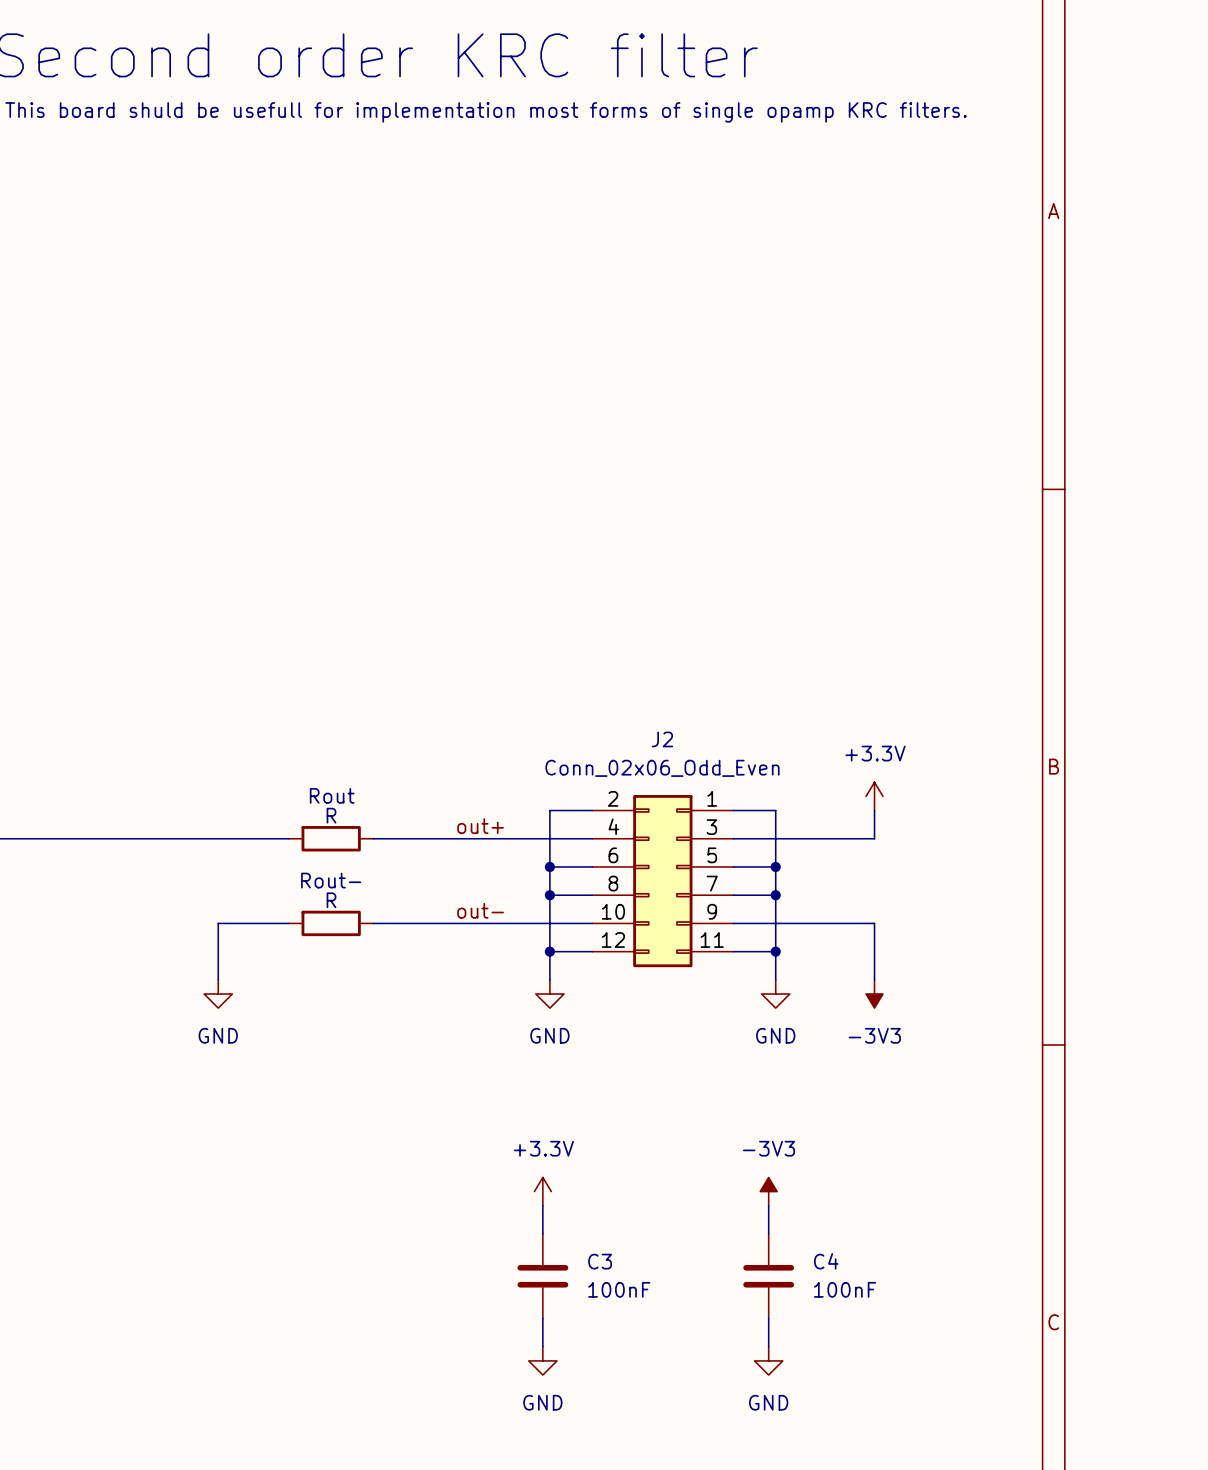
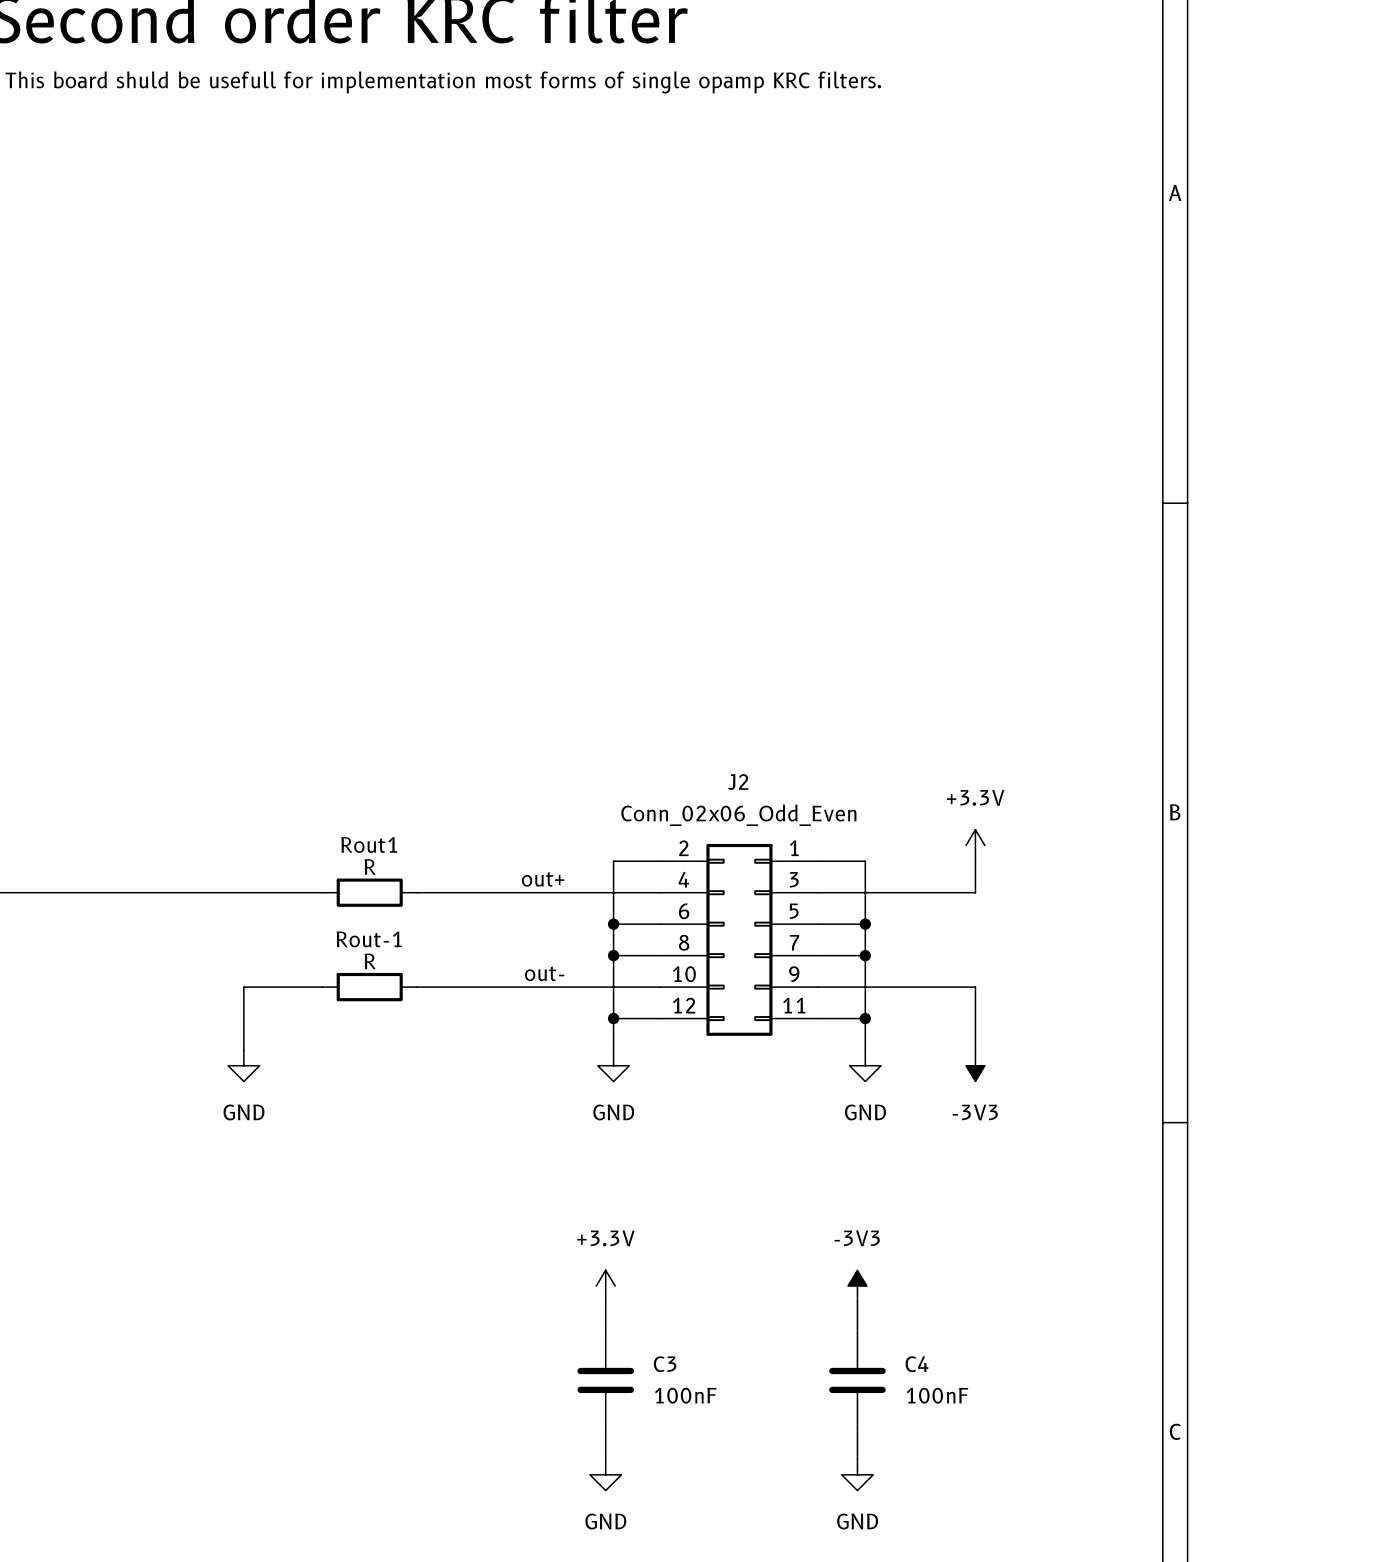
Rout name: Rout (332, 795) -> Rout1 (369, 845)
Rout- name: Rout- (331, 880) -> Rout-1 (369, 939)

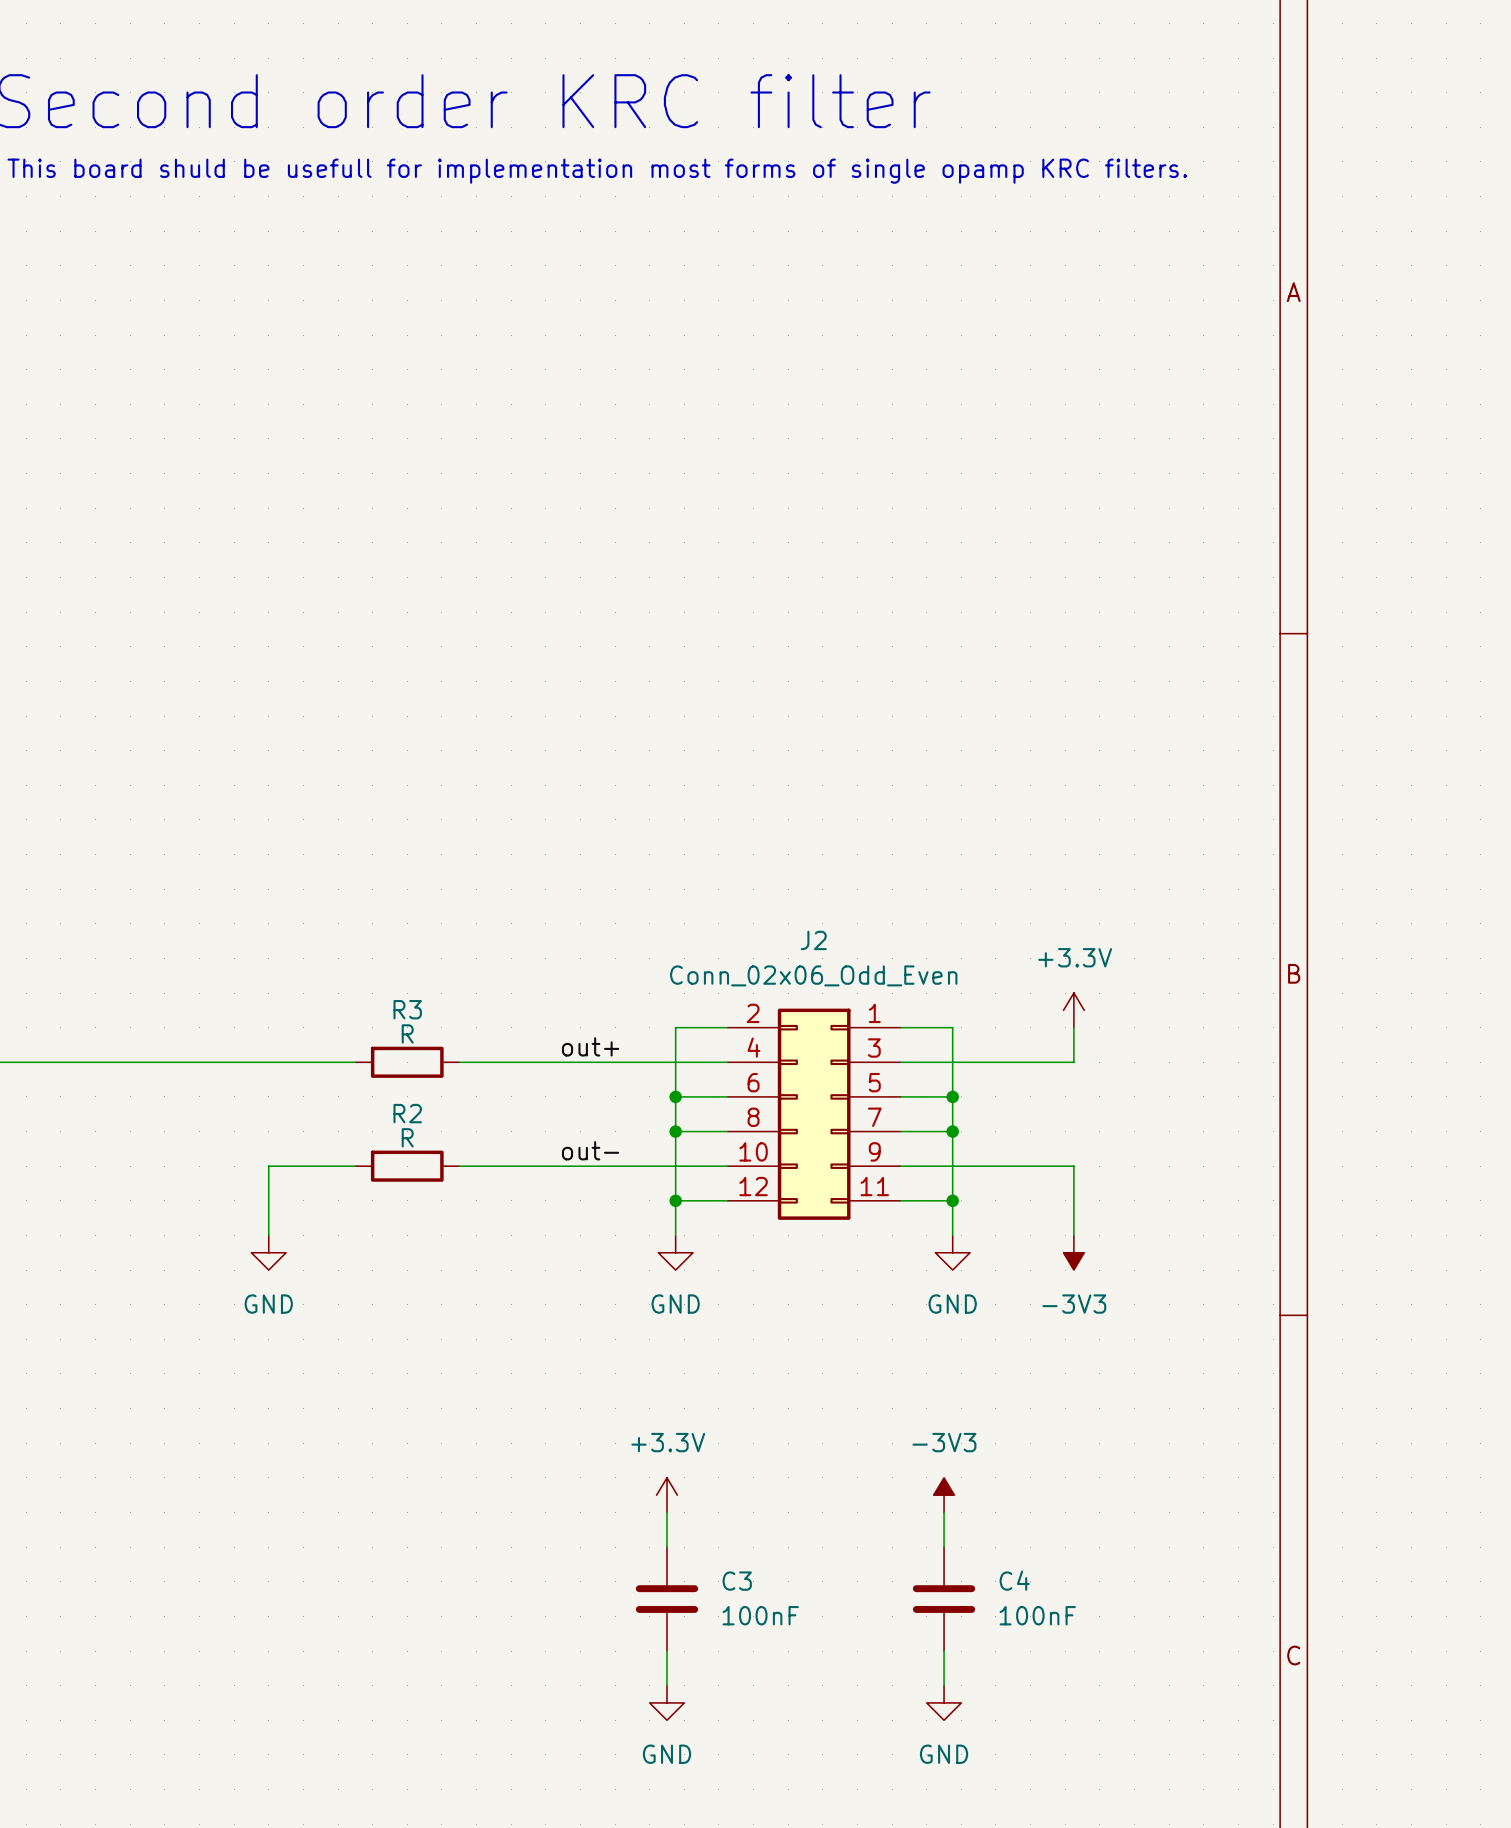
Rout1 name: Rout1 (369, 845) -> R3 (407, 1009)
Rout-1 name: Rout-1 (369, 939) -> R2 (407, 1113)

